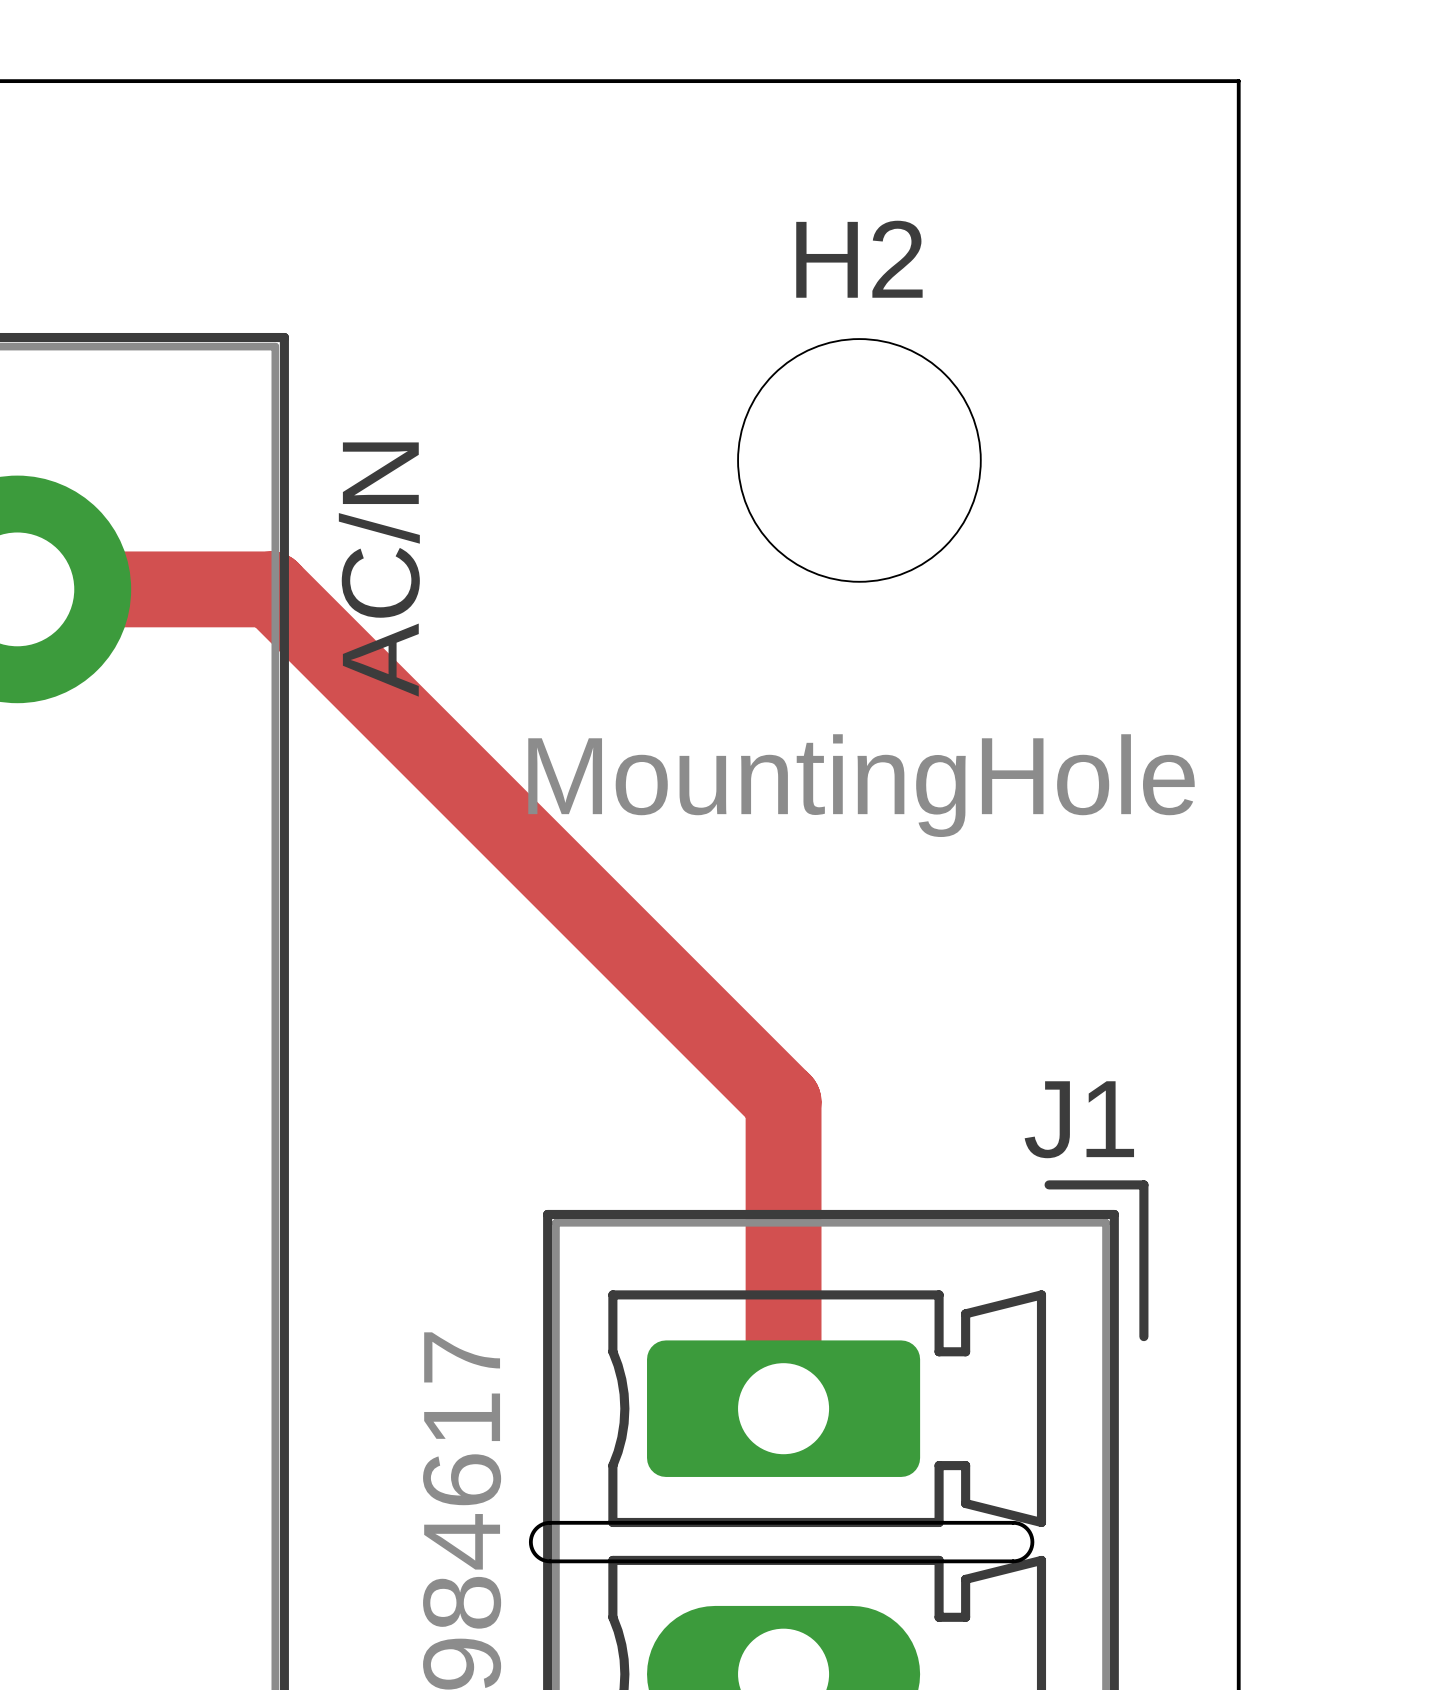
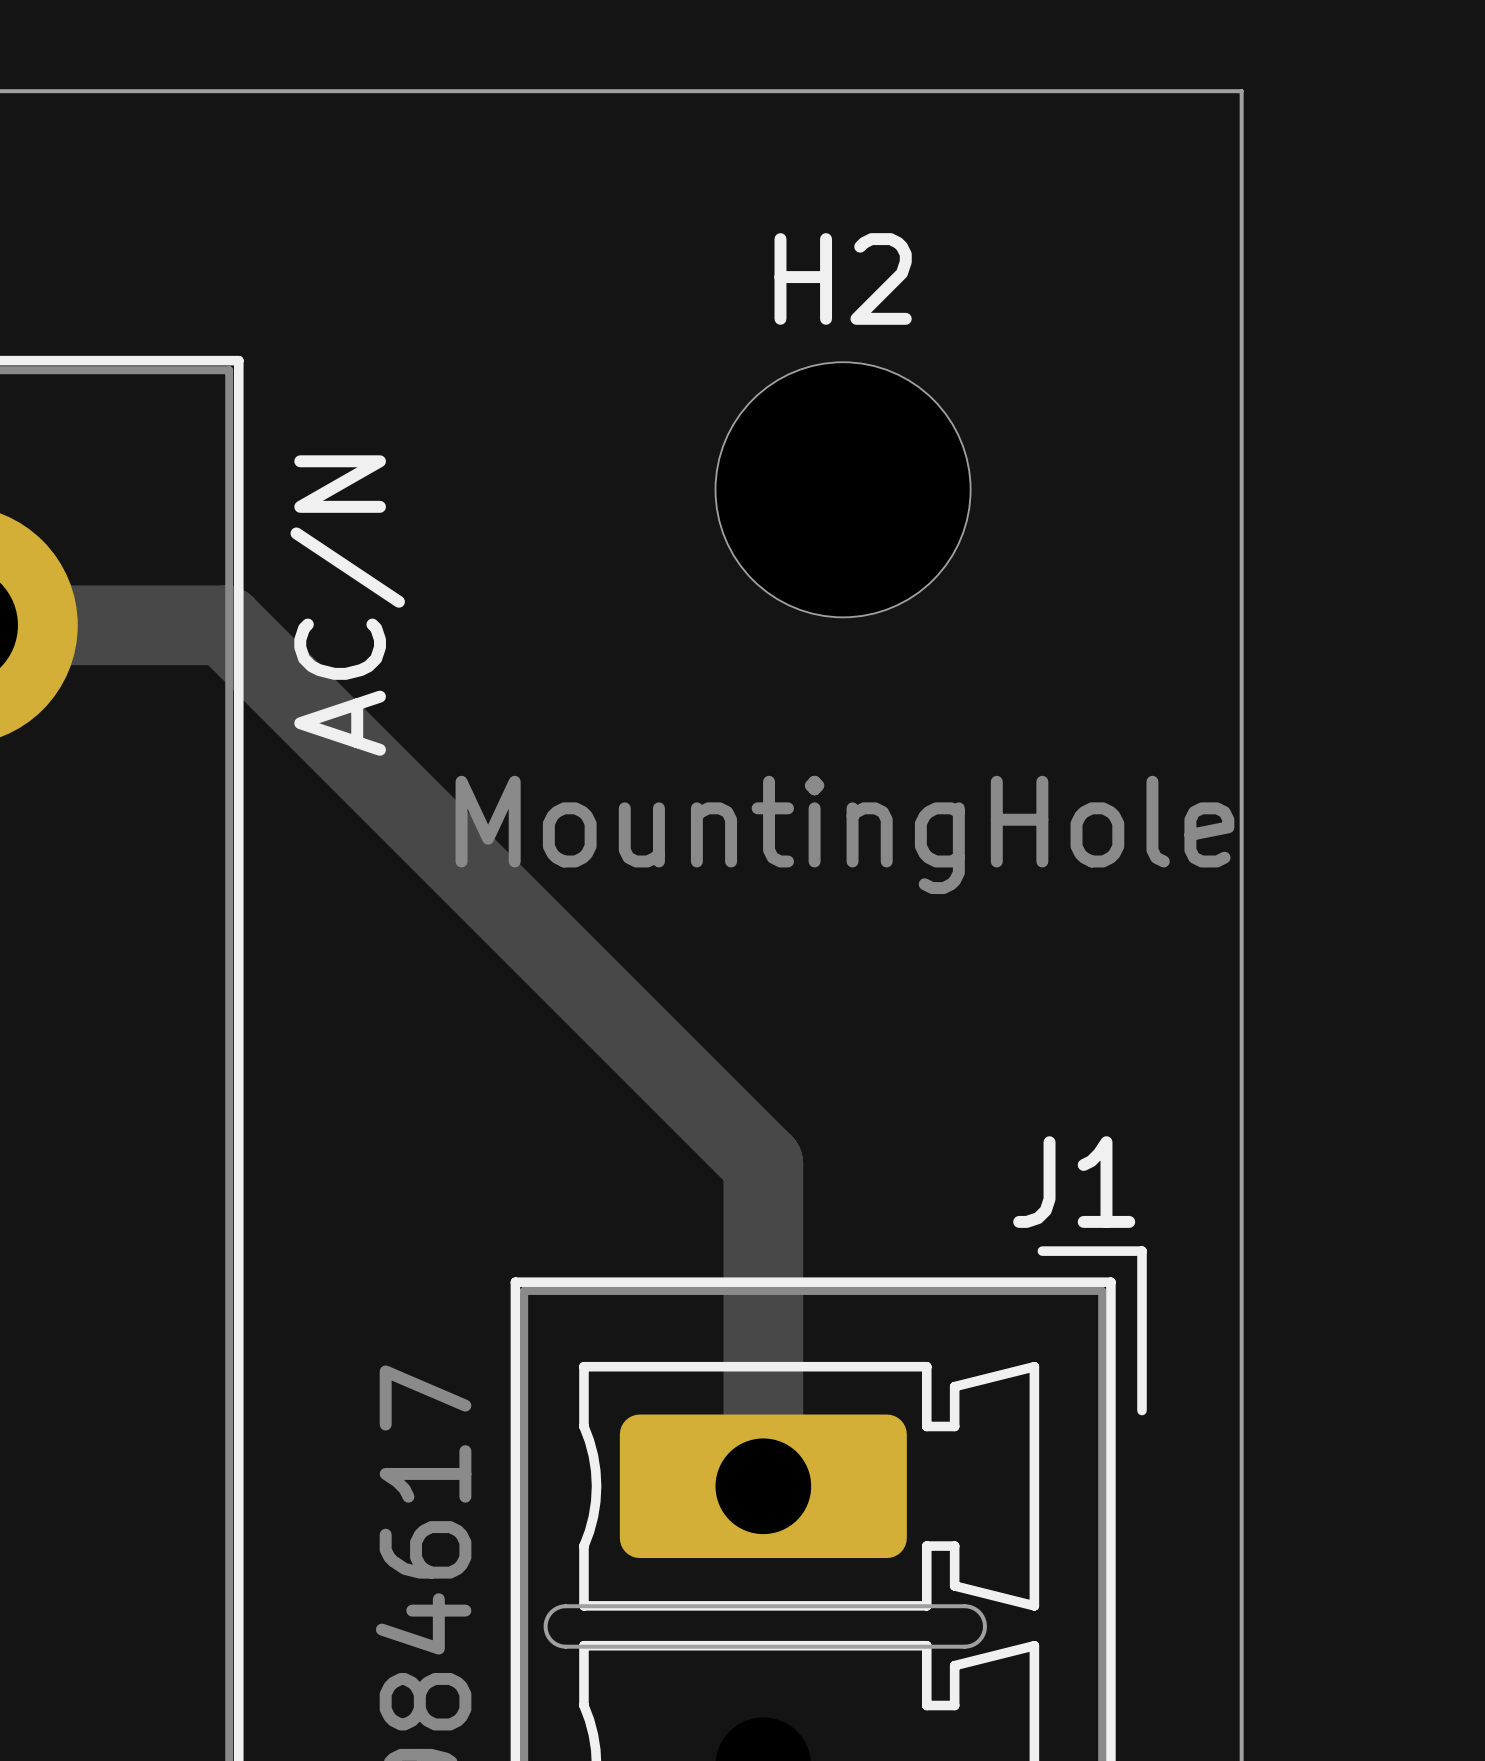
board edge: (595, 1522) (545, 1523) (534, 1530) (530, 1542) (534, 1553) (545, 1560) (595, 1561) -> (565, 1606) (558, 1607) (551, 1612) (547, 1618) (545, 1626) (547, 1634) (551, 1640) (558, 1645) (565, 1646)
board edge: (974, 1522) (1012, 1522) -> (964, 1606) (972, 1607) (979, 1612) (983, 1618) (984, 1626) (983, 1634) (979, 1640) (972, 1645) (964, 1646)
board edge: (1013, 1522) (1026, 1528) (1032, 1542) (1026, 1555) (1013, 1561) -> none
board edge: (974, 1561) (1012, 1561) -> none

